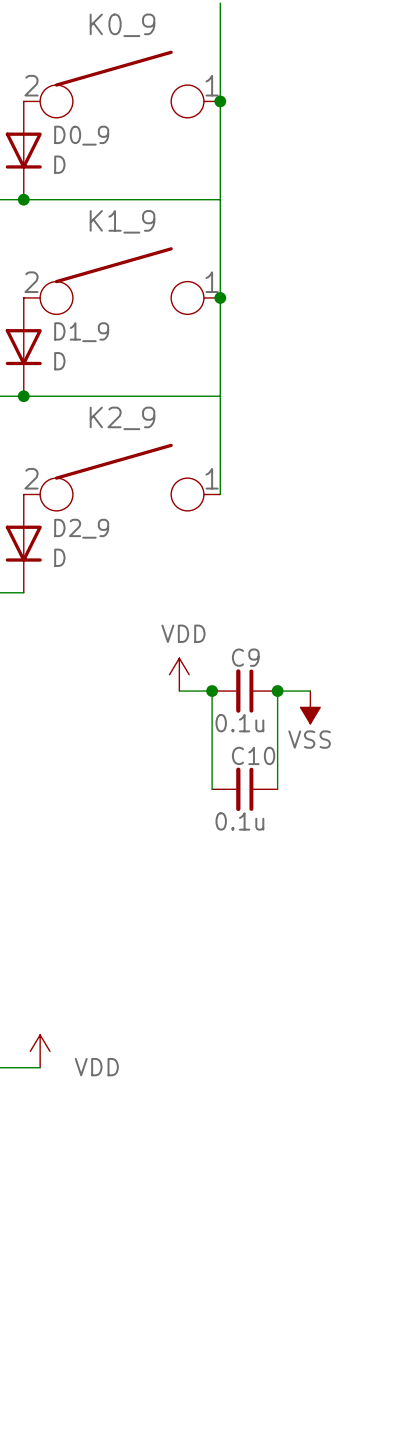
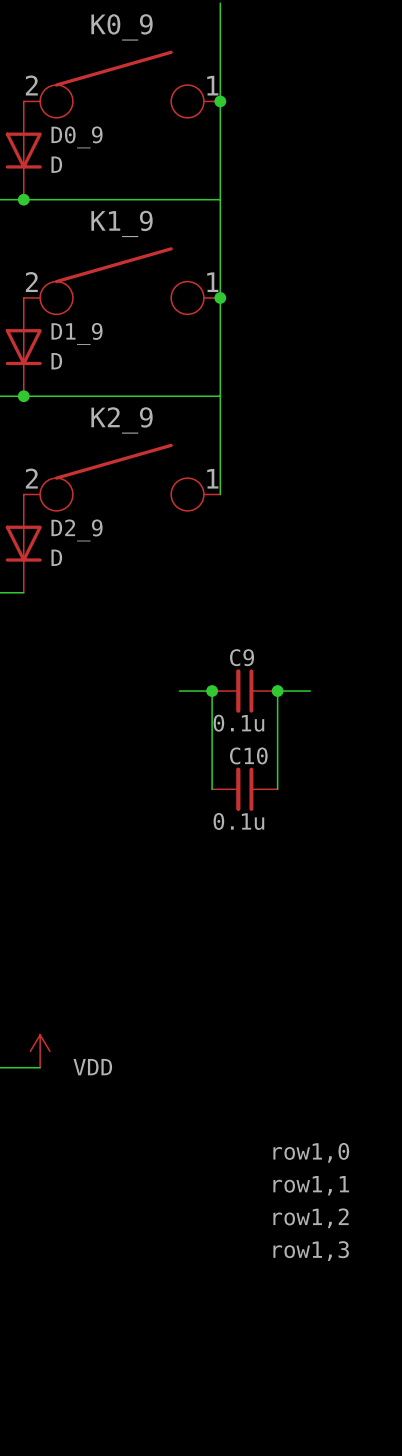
power symbol: VDD (179, 674) -> none
power symbol: VSS (310, 707) -> none
label: none -> row1,0 (311, 1152)
label: none -> row1,1 (311, 1185)
label: none -> row1,2 (311, 1218)
label: none -> row1,3 (311, 1251)

